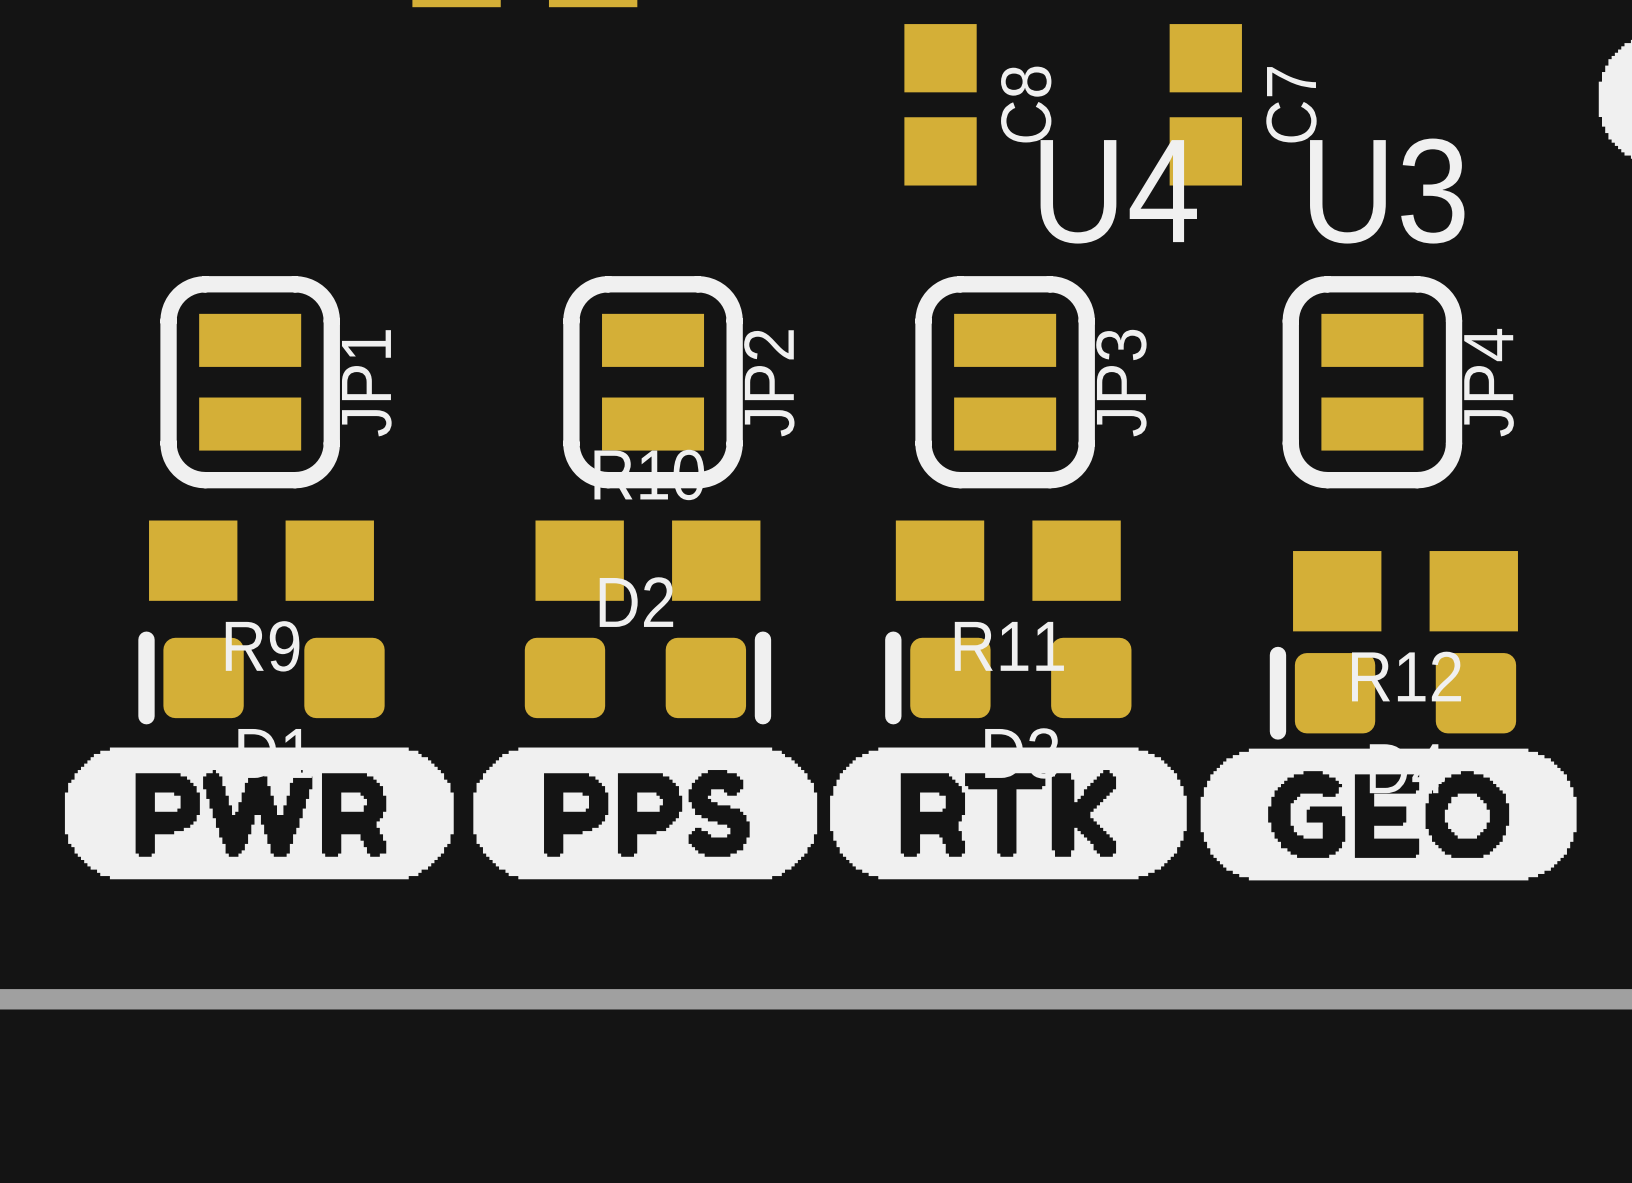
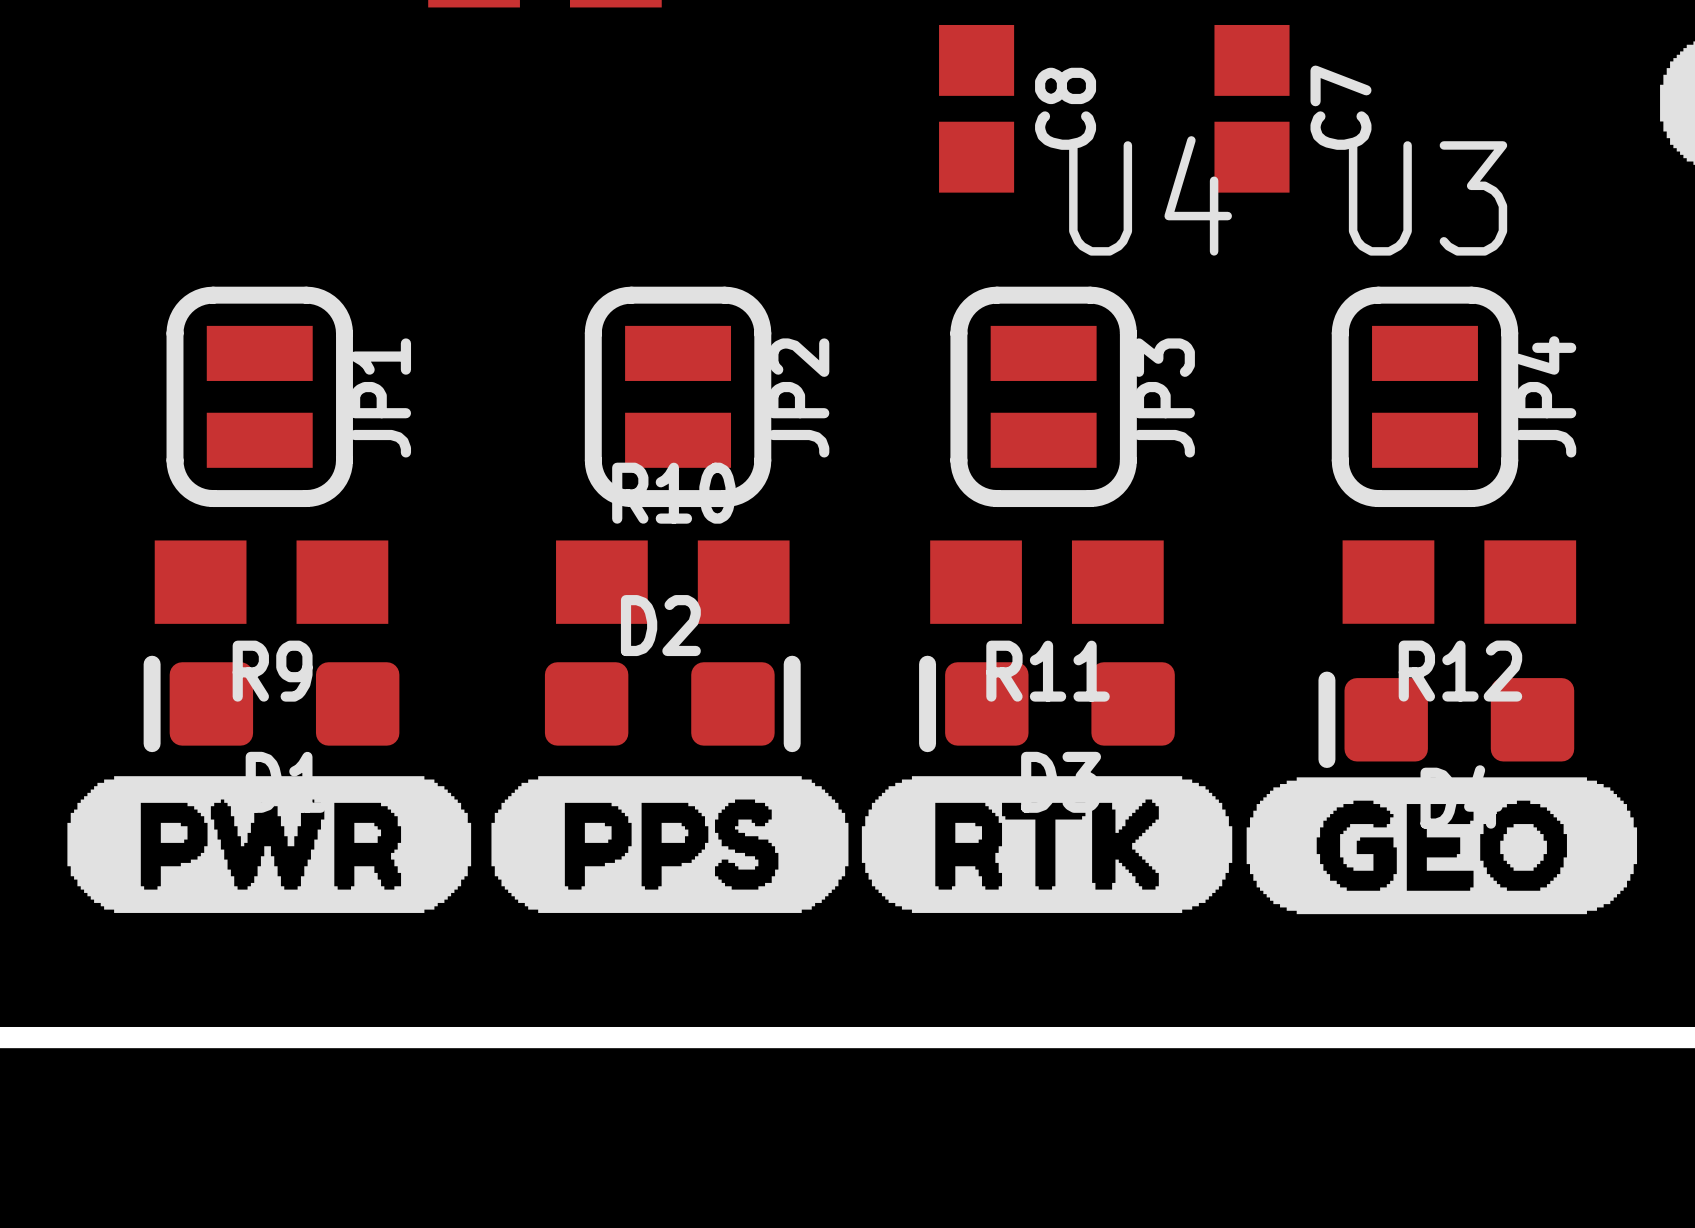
R12 position: (1405, 591) -> (1459, 582)

